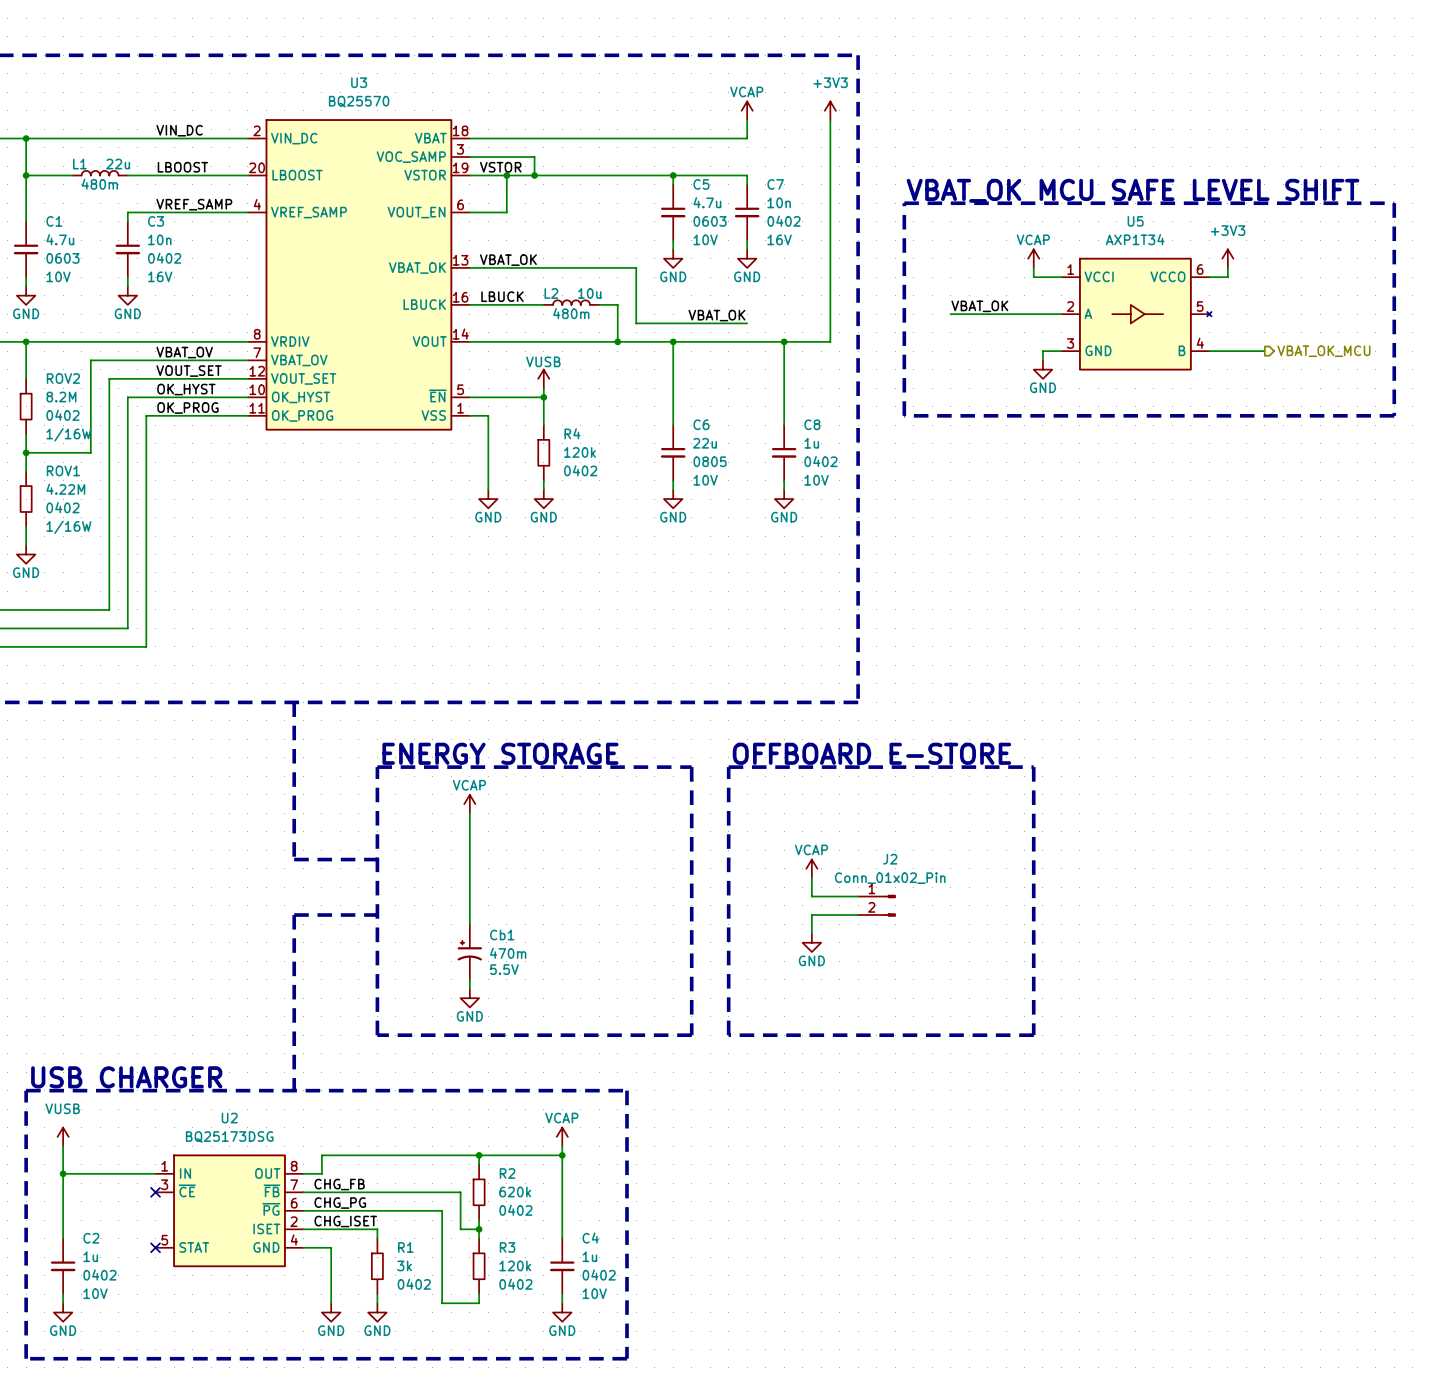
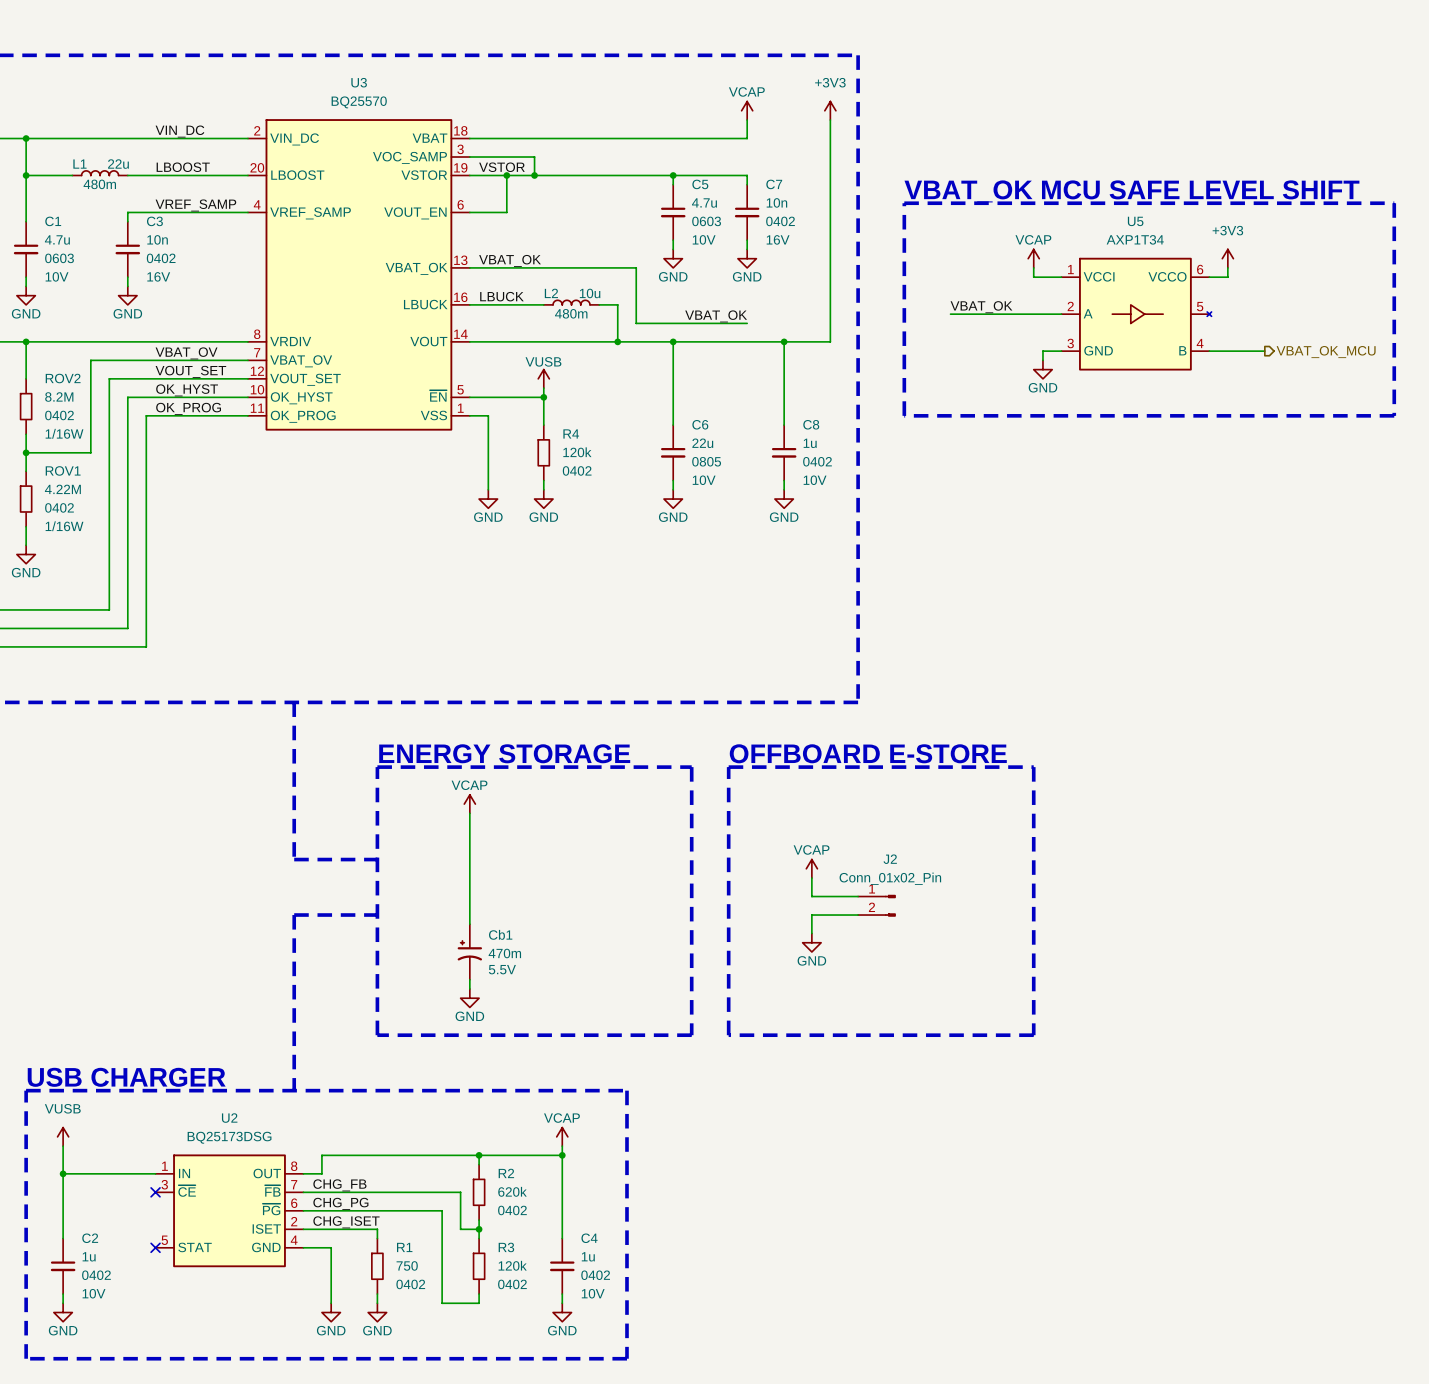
R1 value: 3k (404, 1265) -> 750 (407, 1265)

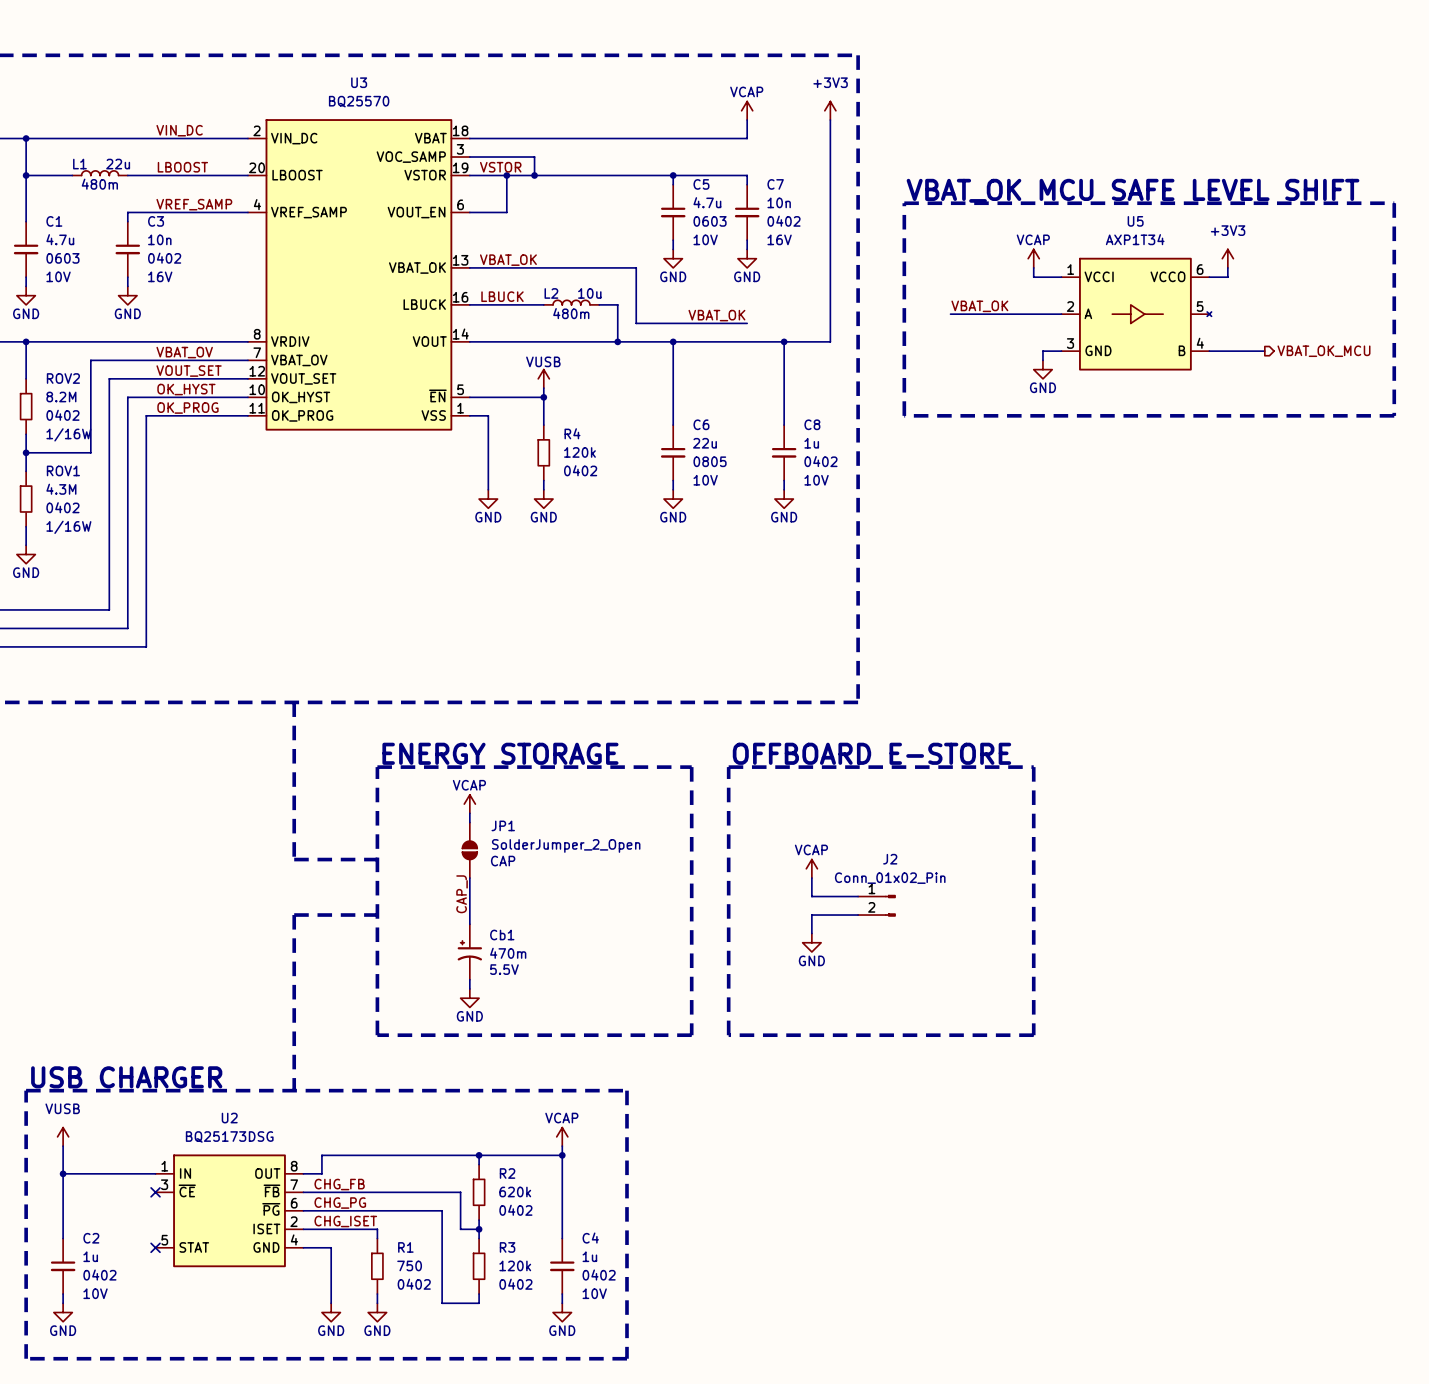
ROV1 value: 4.22M (62, 489) -> 4.3M (61, 489)
JP1: none -> SolderJumper_2_Open (469, 850)
label: none -> CAP_J (462, 894)

